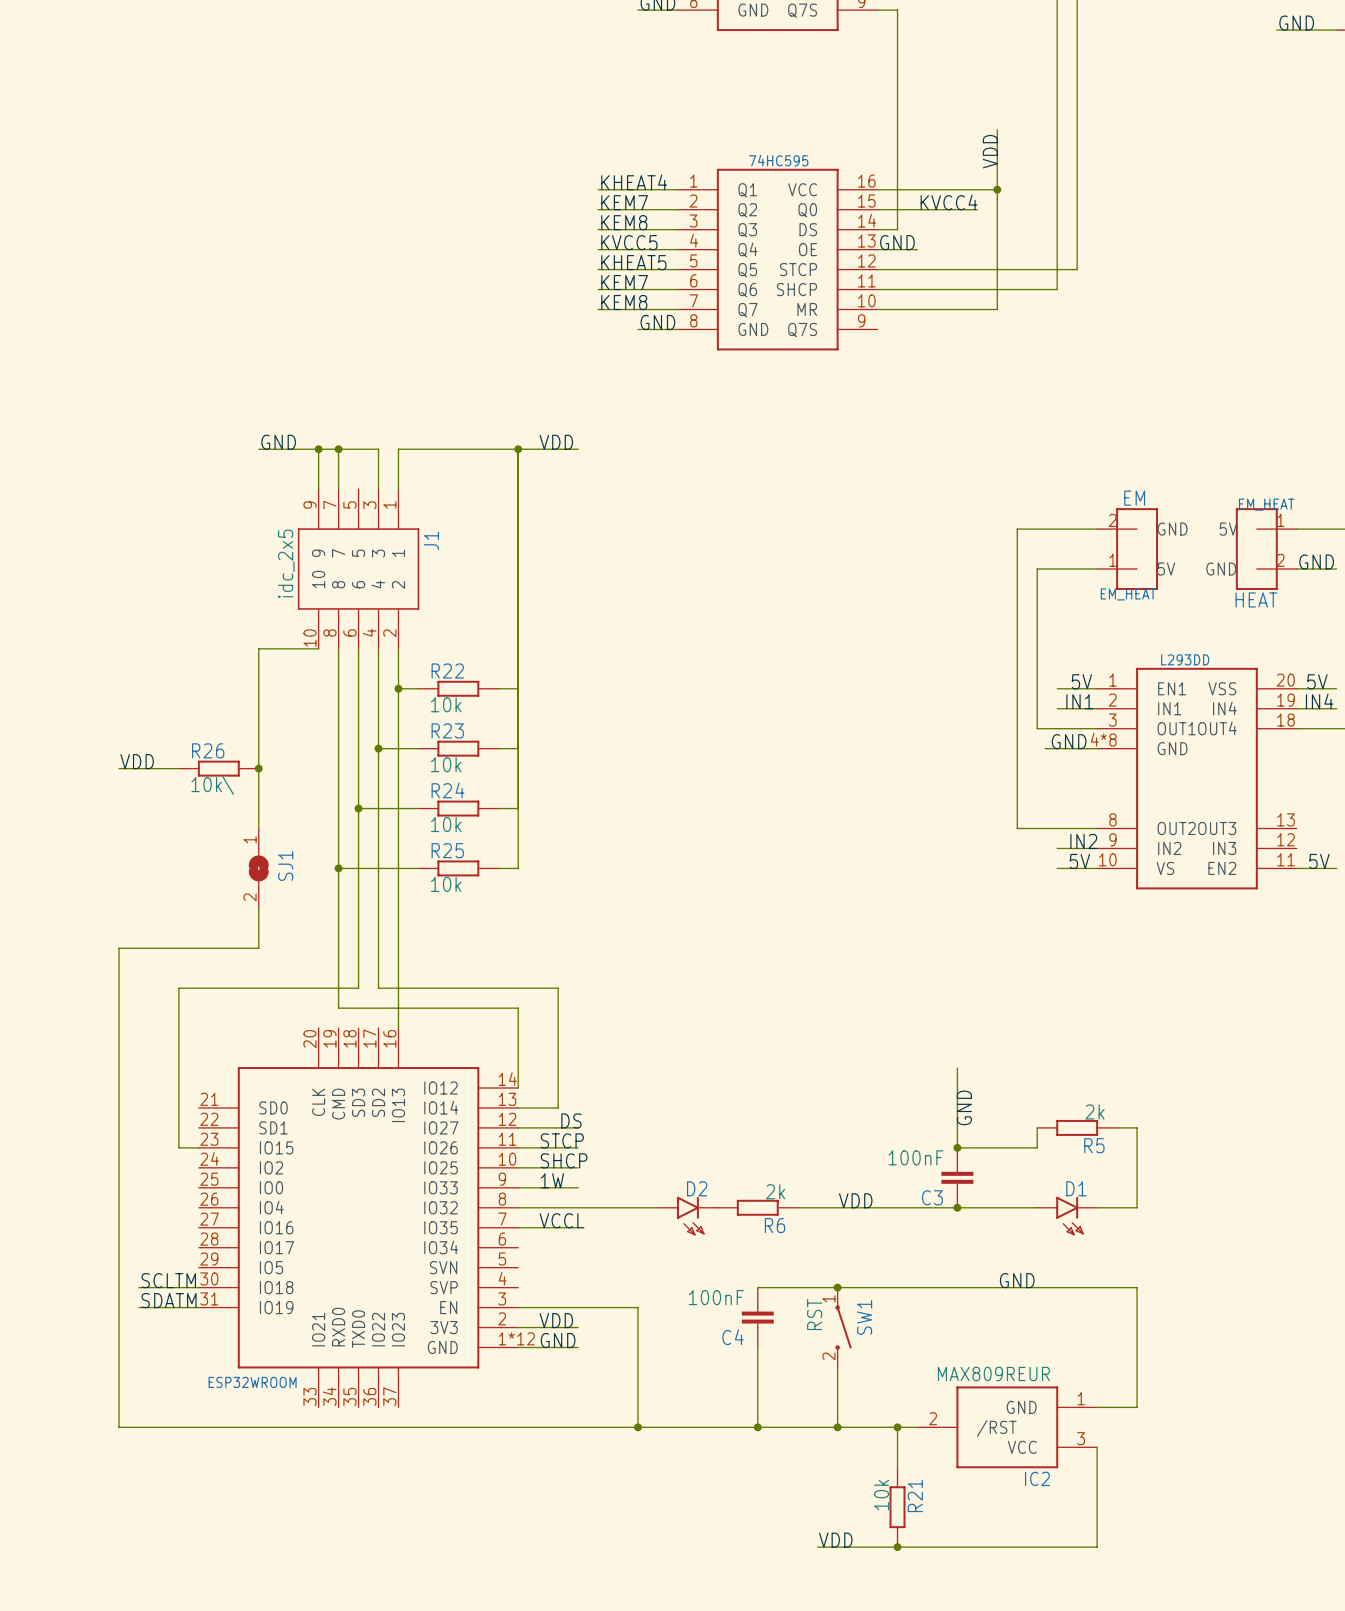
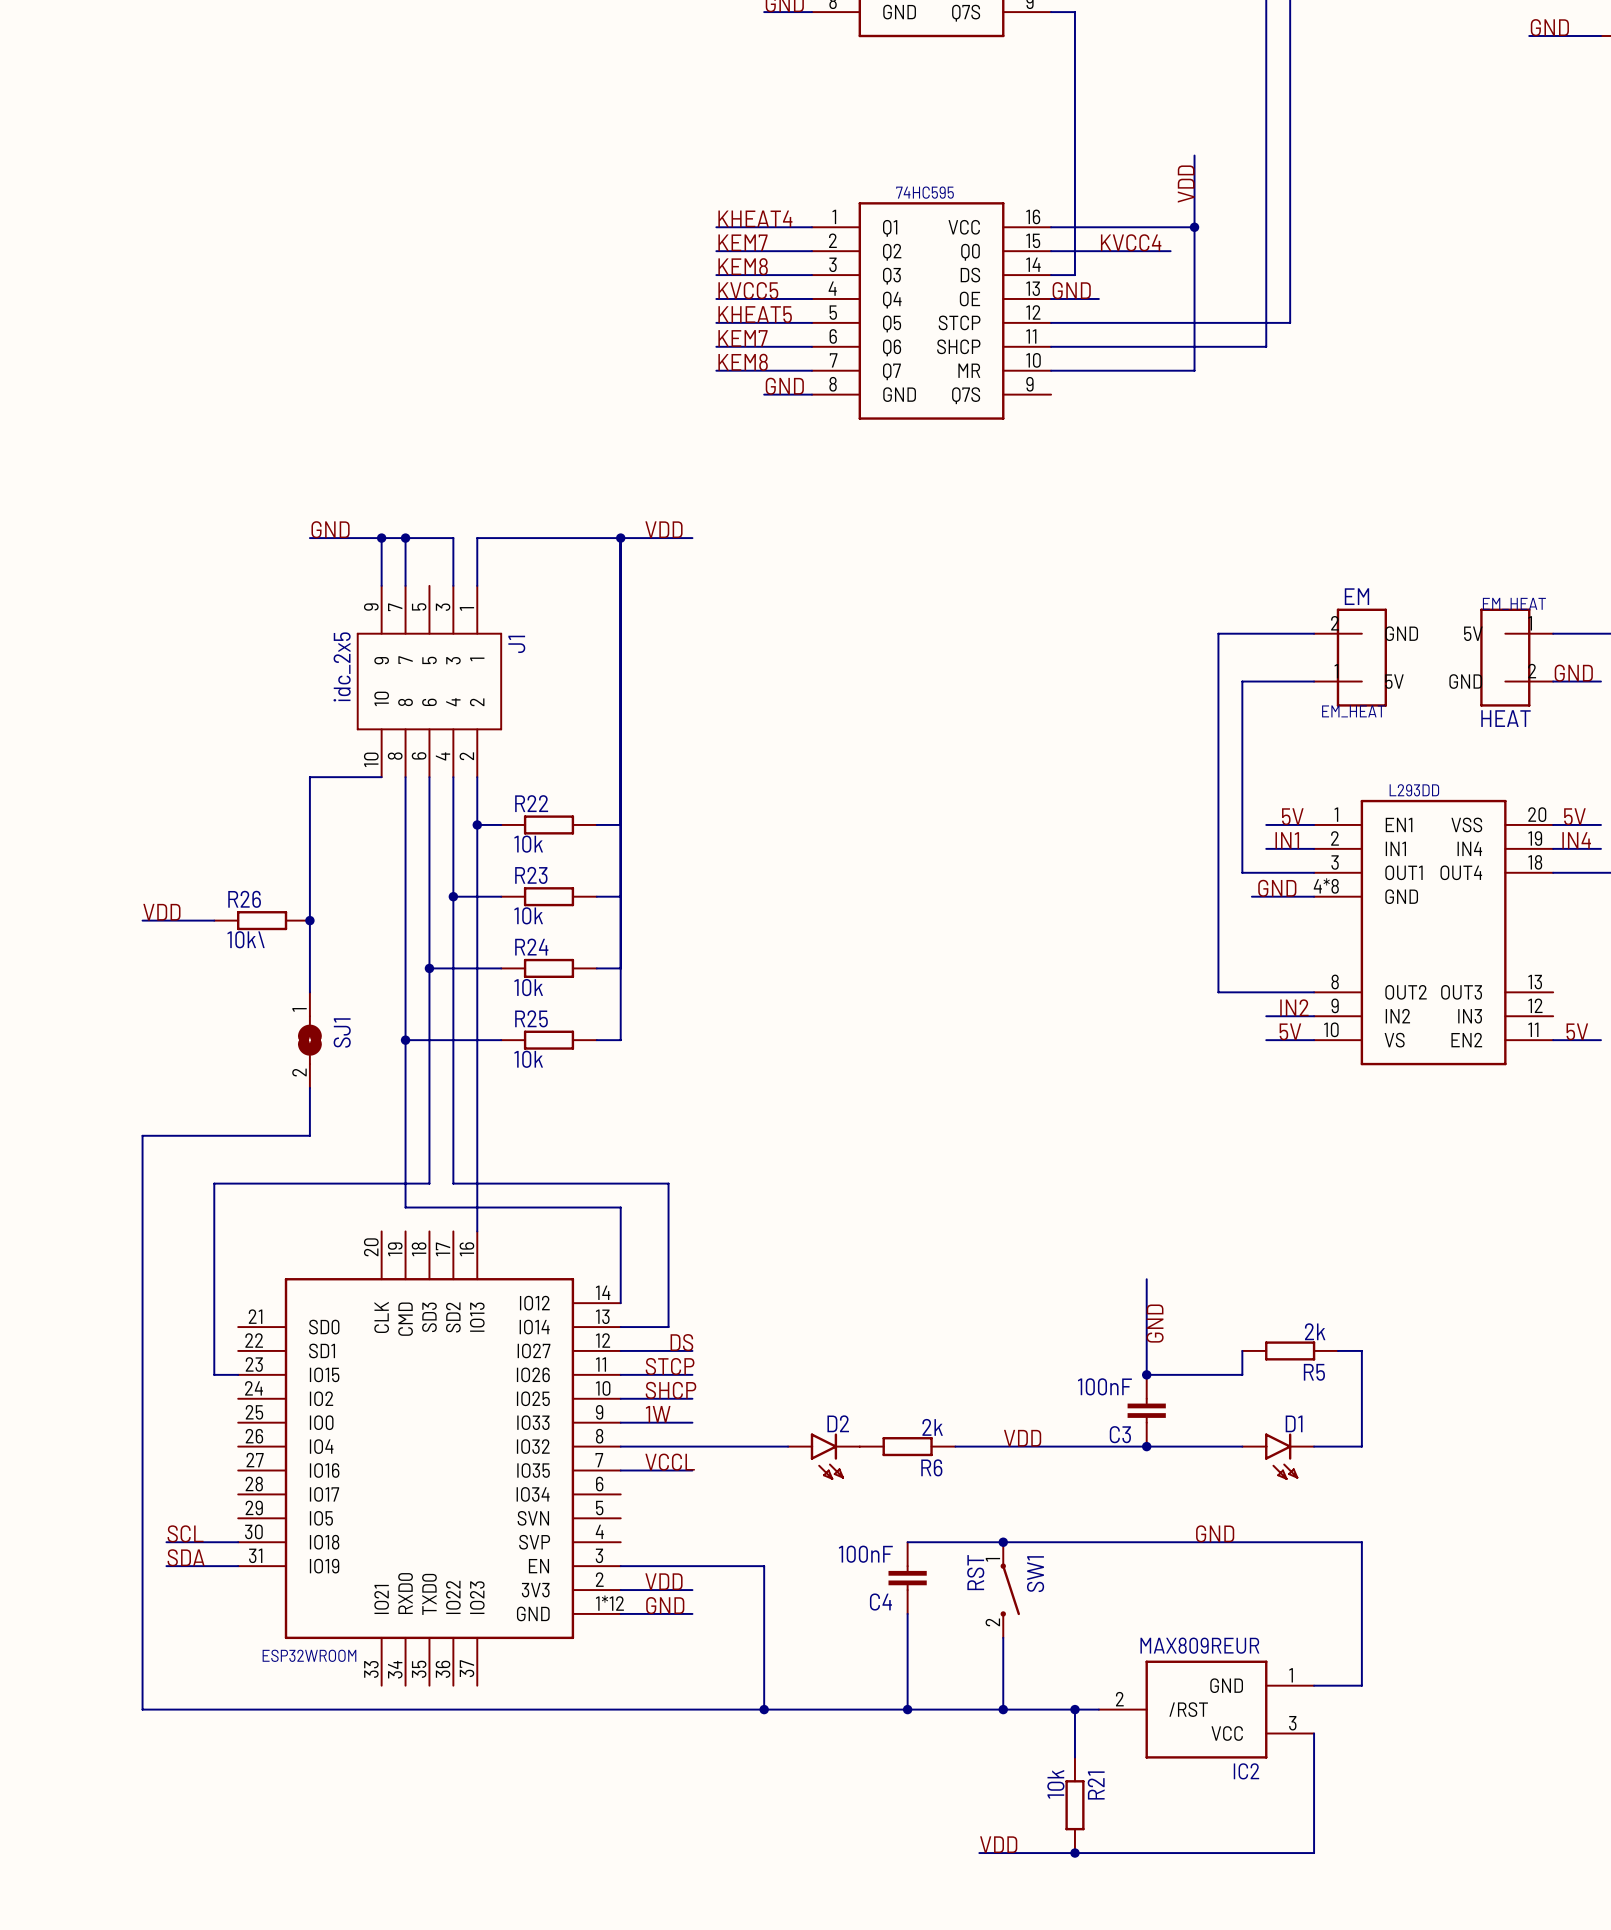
label: SCLTM (168, 1280) -> SCL (185, 1533)
label: SDATM (169, 1300) -> SDA (186, 1557)

